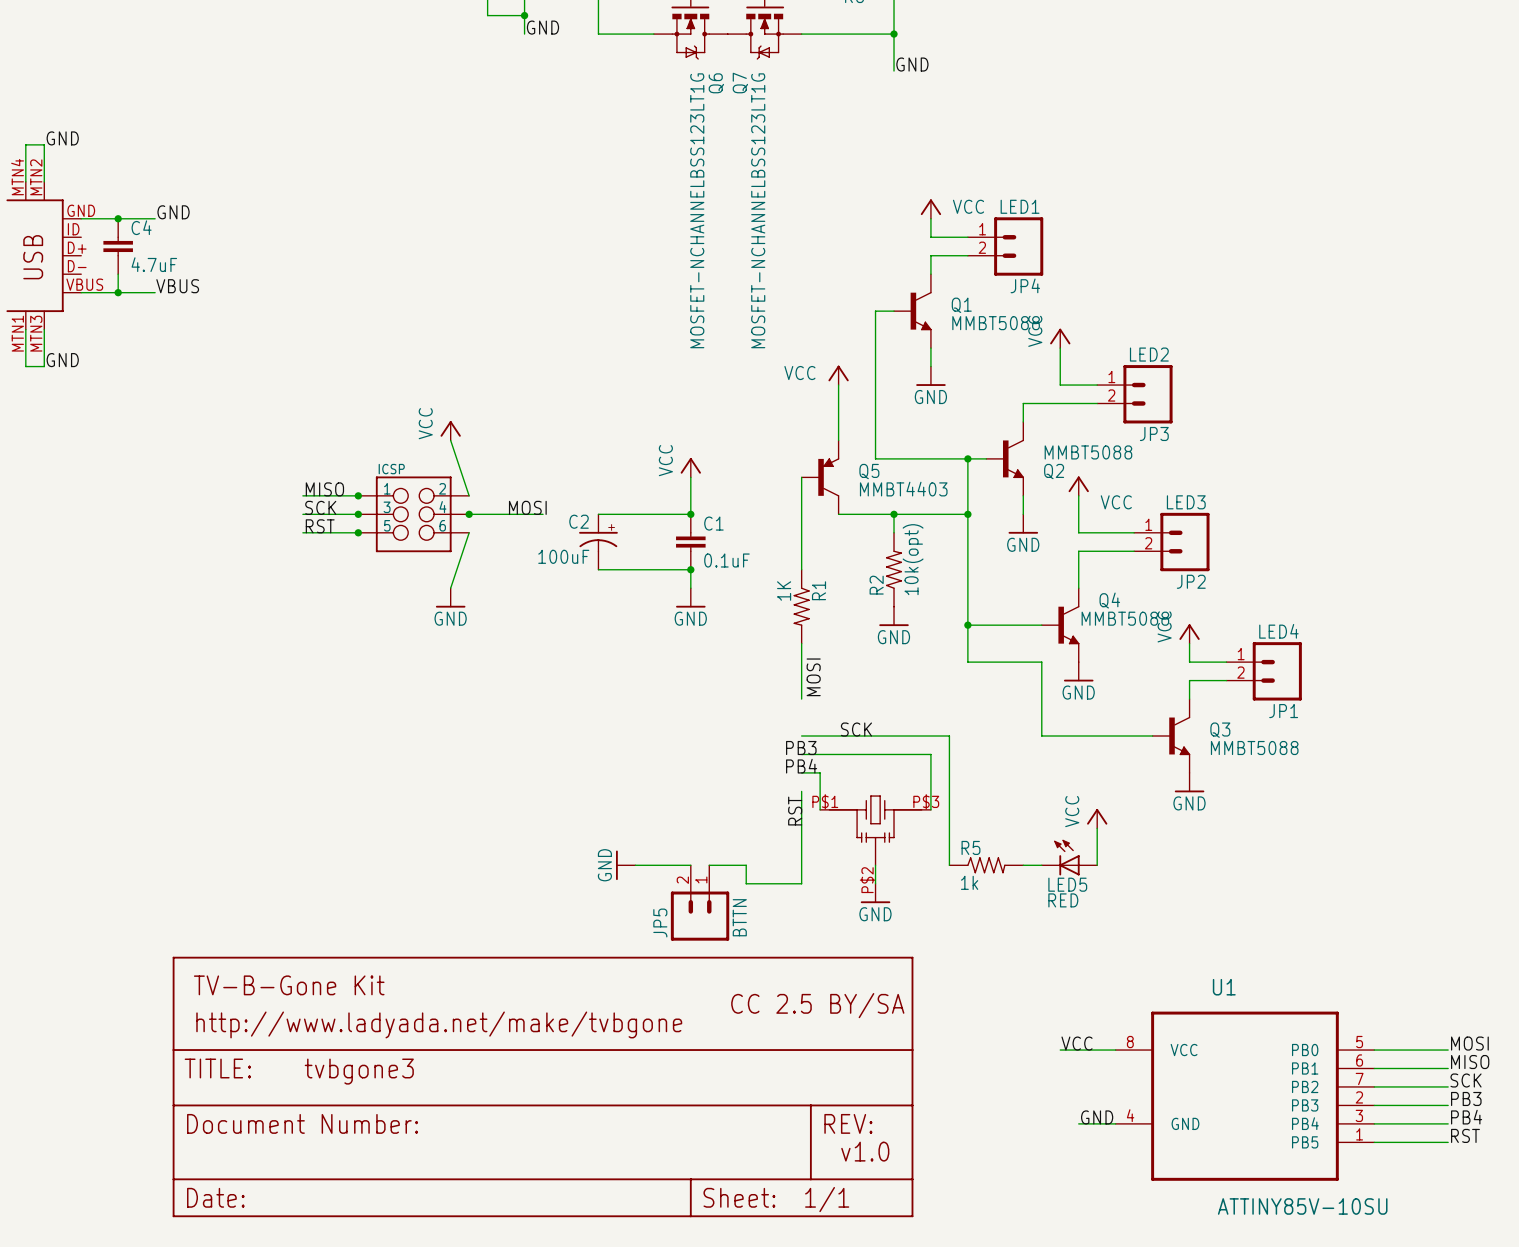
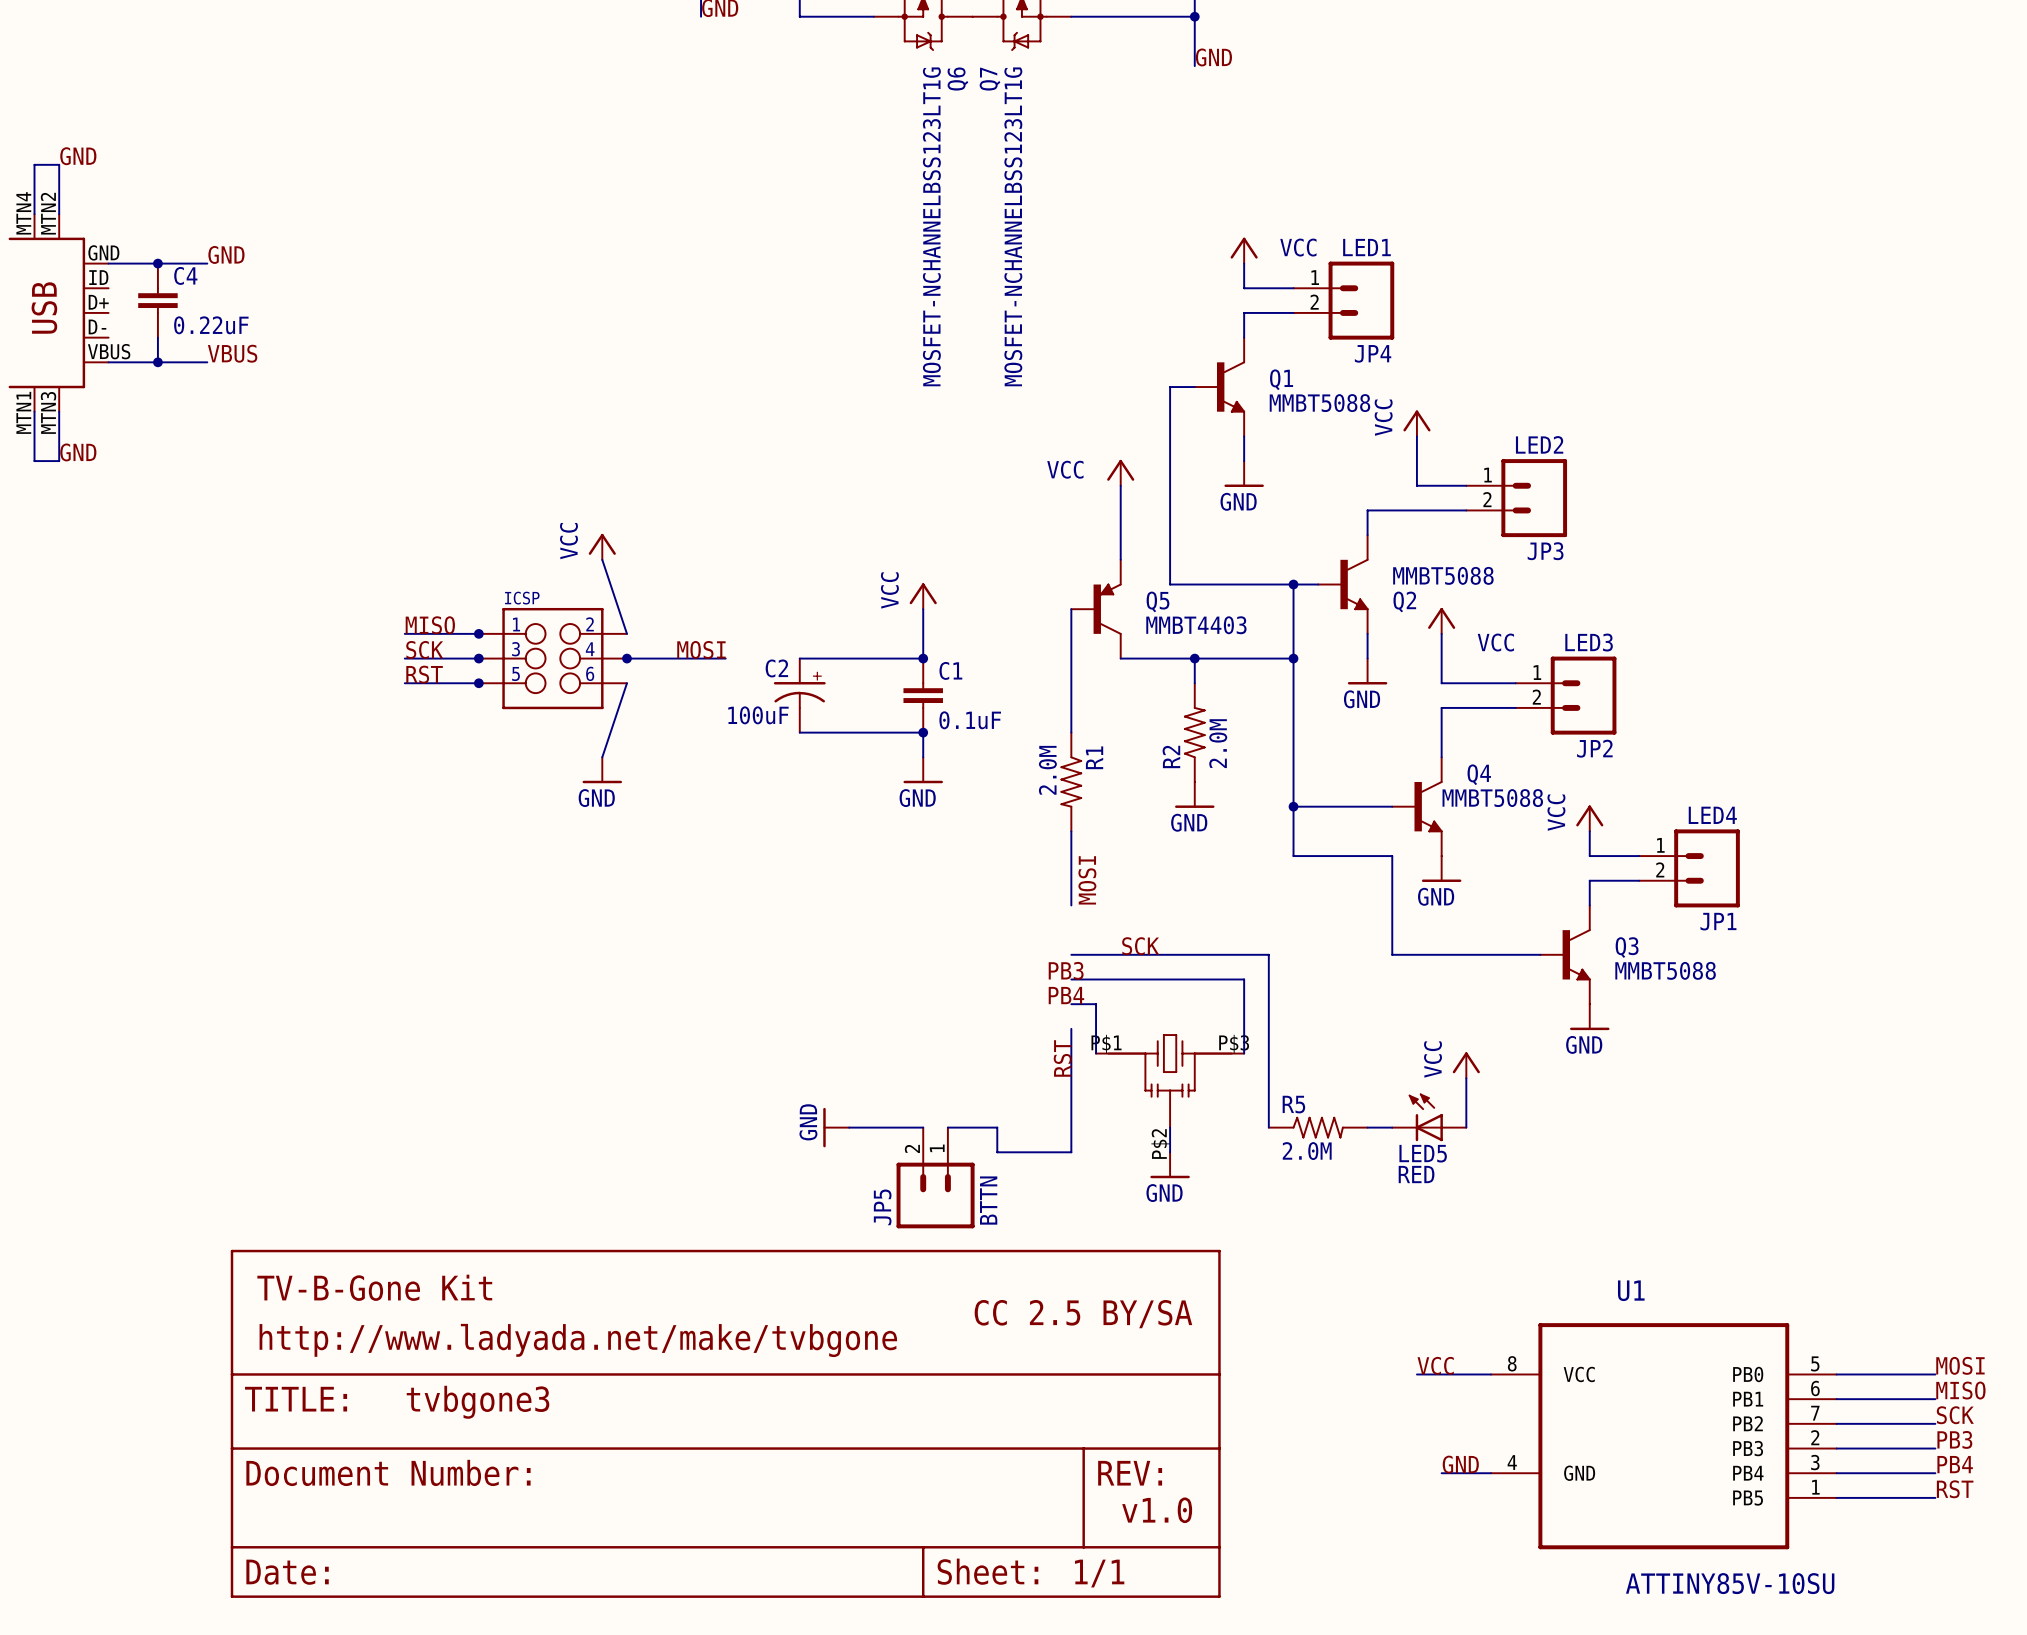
C4 value: 4.7uF (154, 264) -> 0.22uF (211, 325)
R2 value: 10k(opt) (913, 559) -> 2.0M (1218, 743)
R1 value: 1K (784, 591) -> 2.0M (1047, 770)
R5 value: 1k (969, 882) -> 2.0M (1307, 1151)

